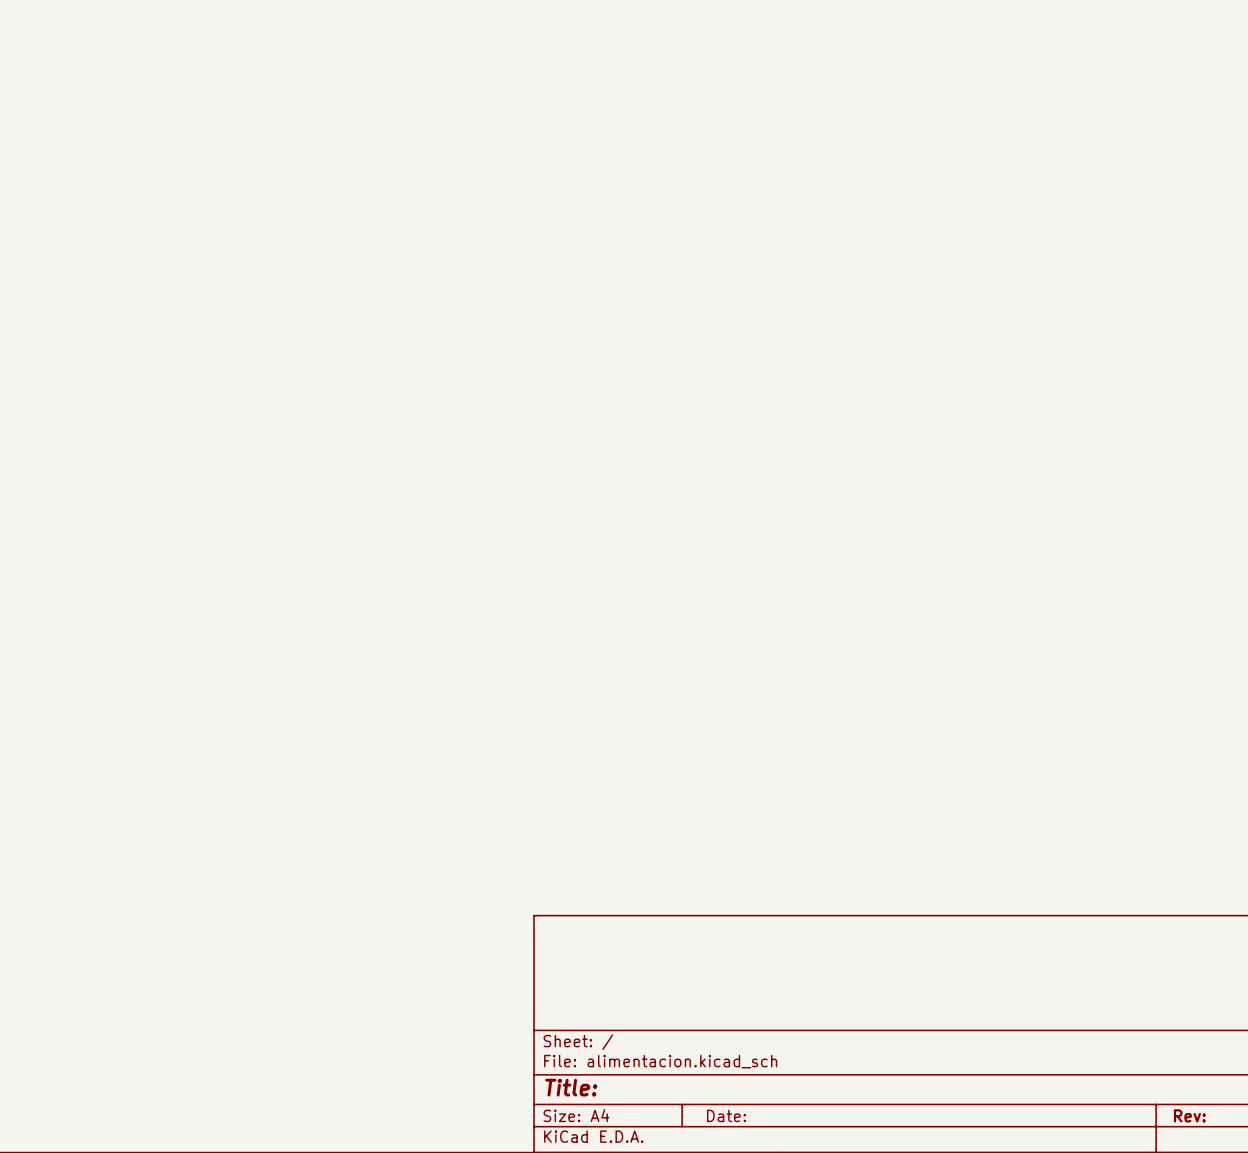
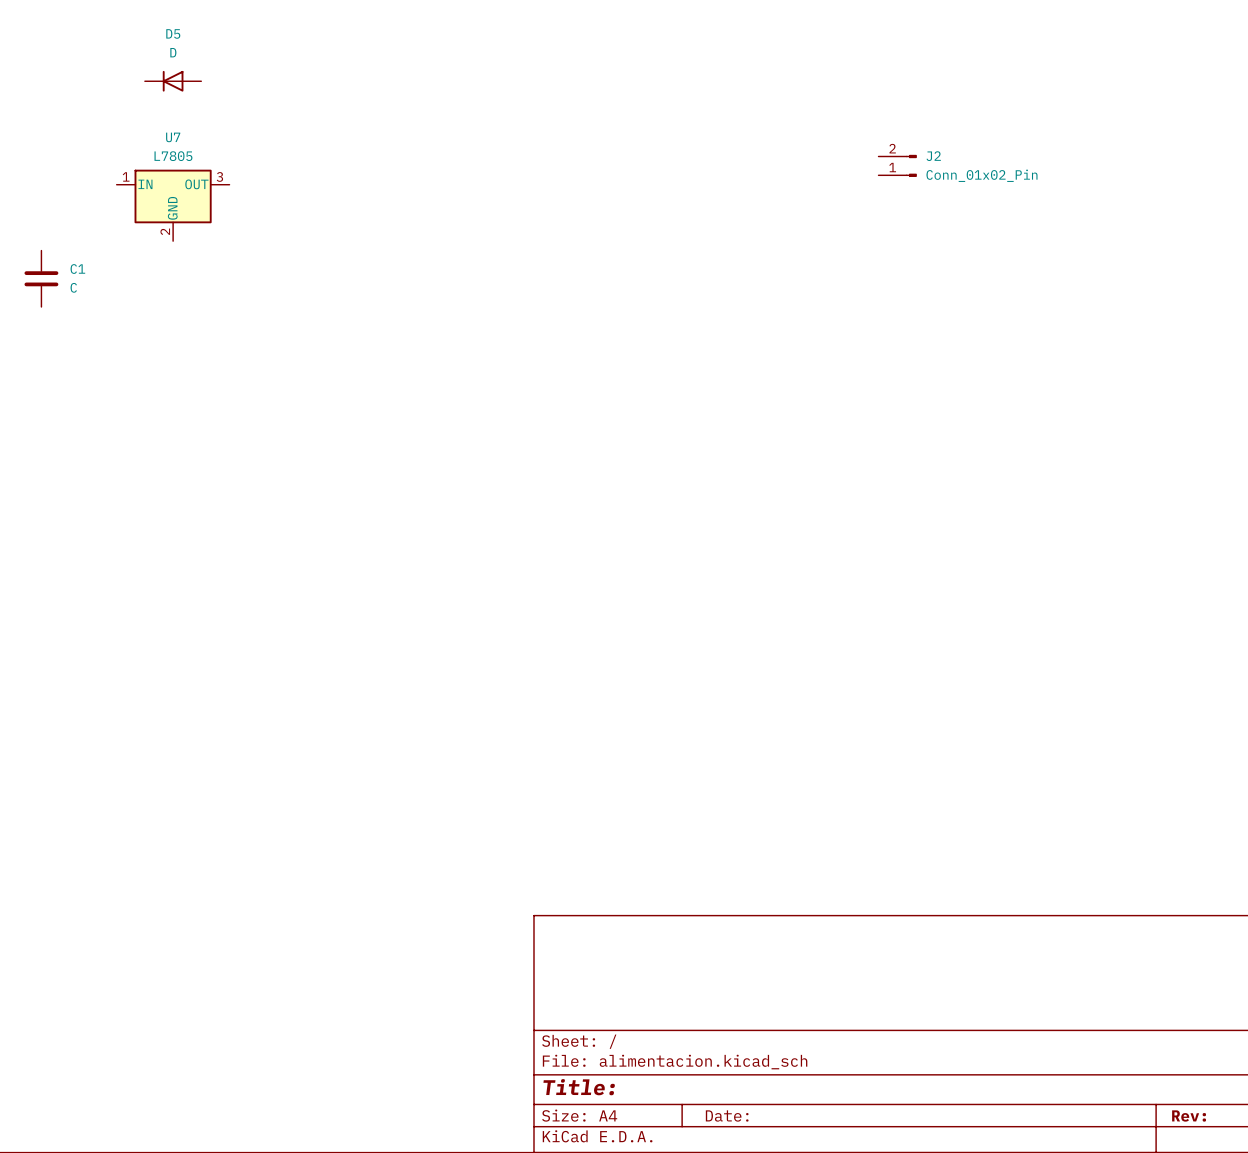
D5: none -> D (173, 81)
J2: none -> Conn_01x02_Pin (897, 165)
U7: none -> L7805 (173, 205)
C1: none -> C (41, 278)

